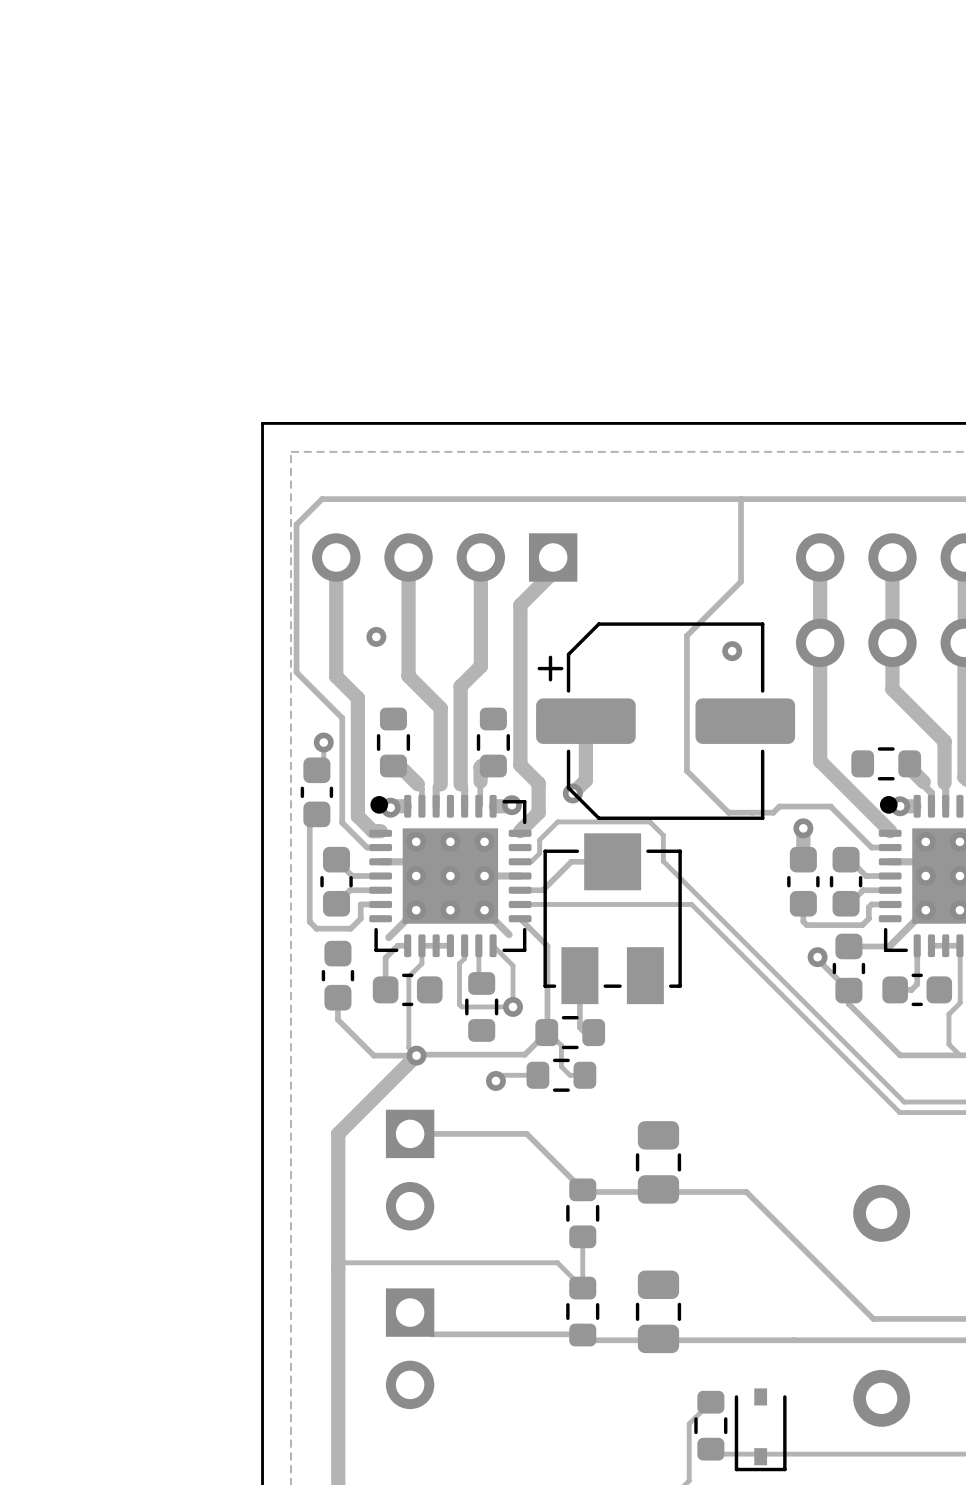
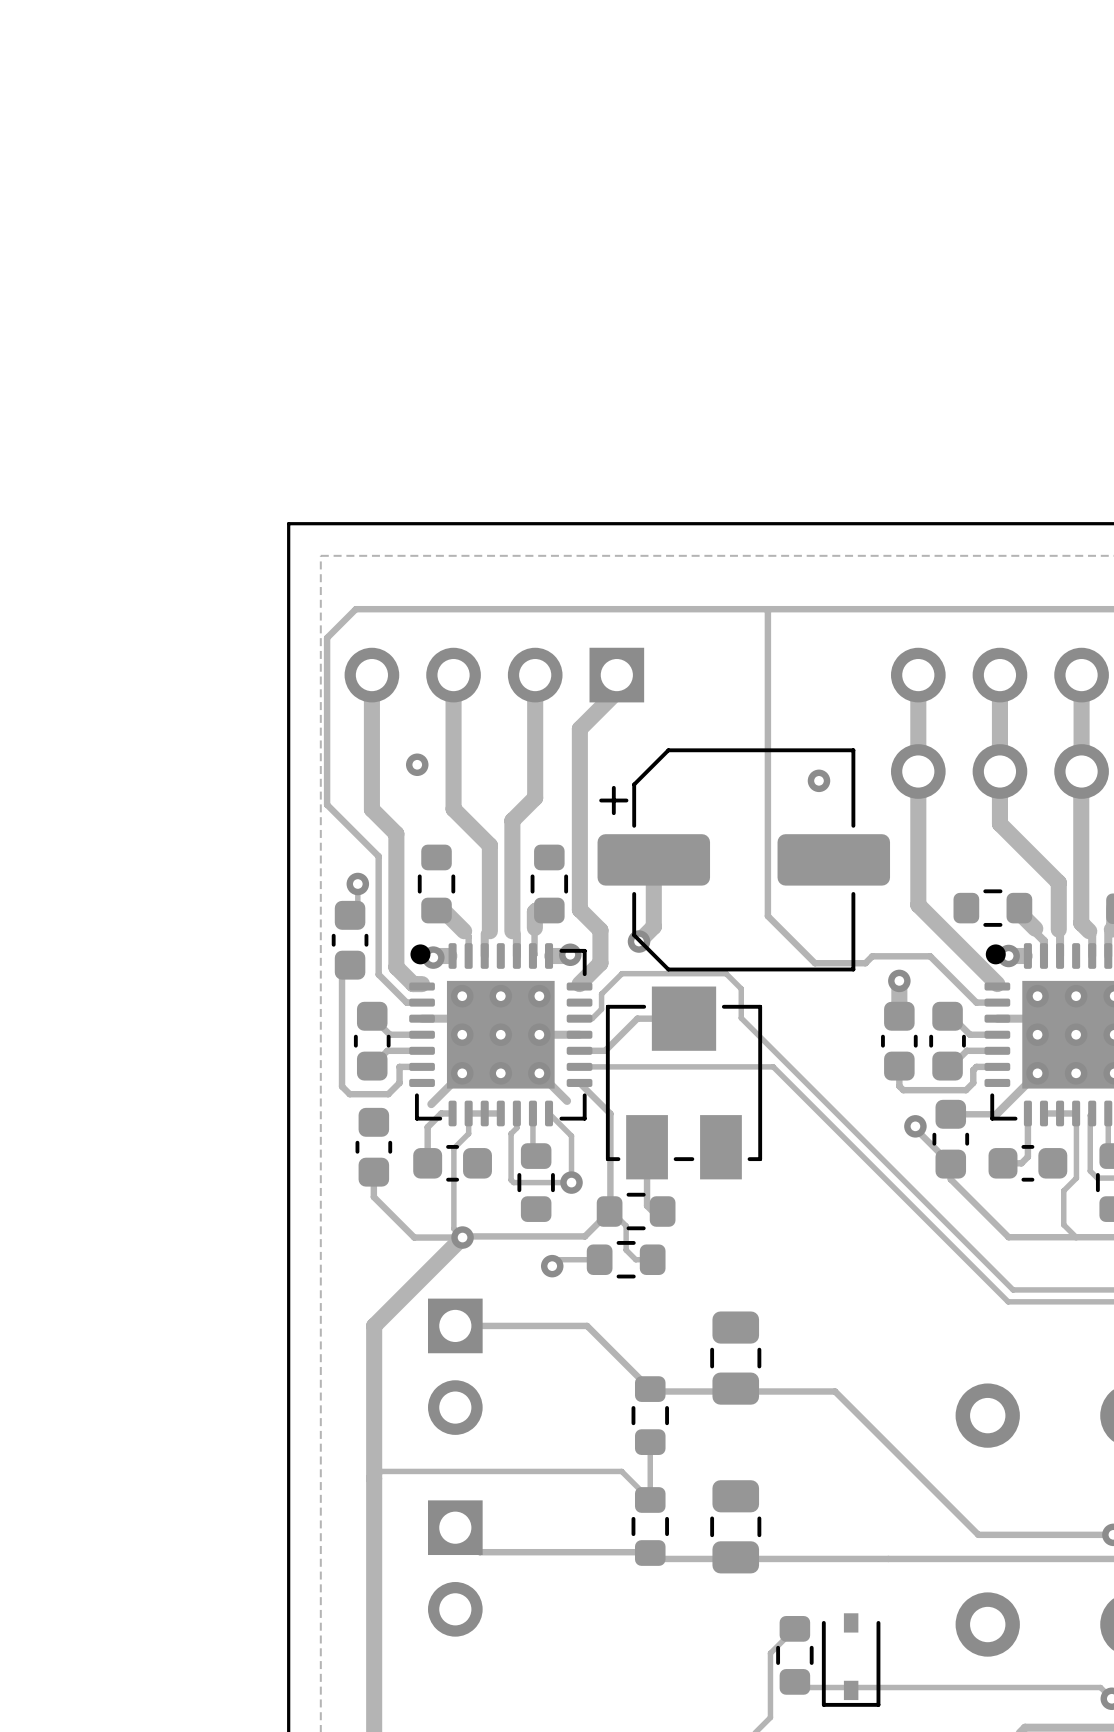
track: (741, 499) (741, 581) (686, 635) -> (767, 609) (767, 763)

